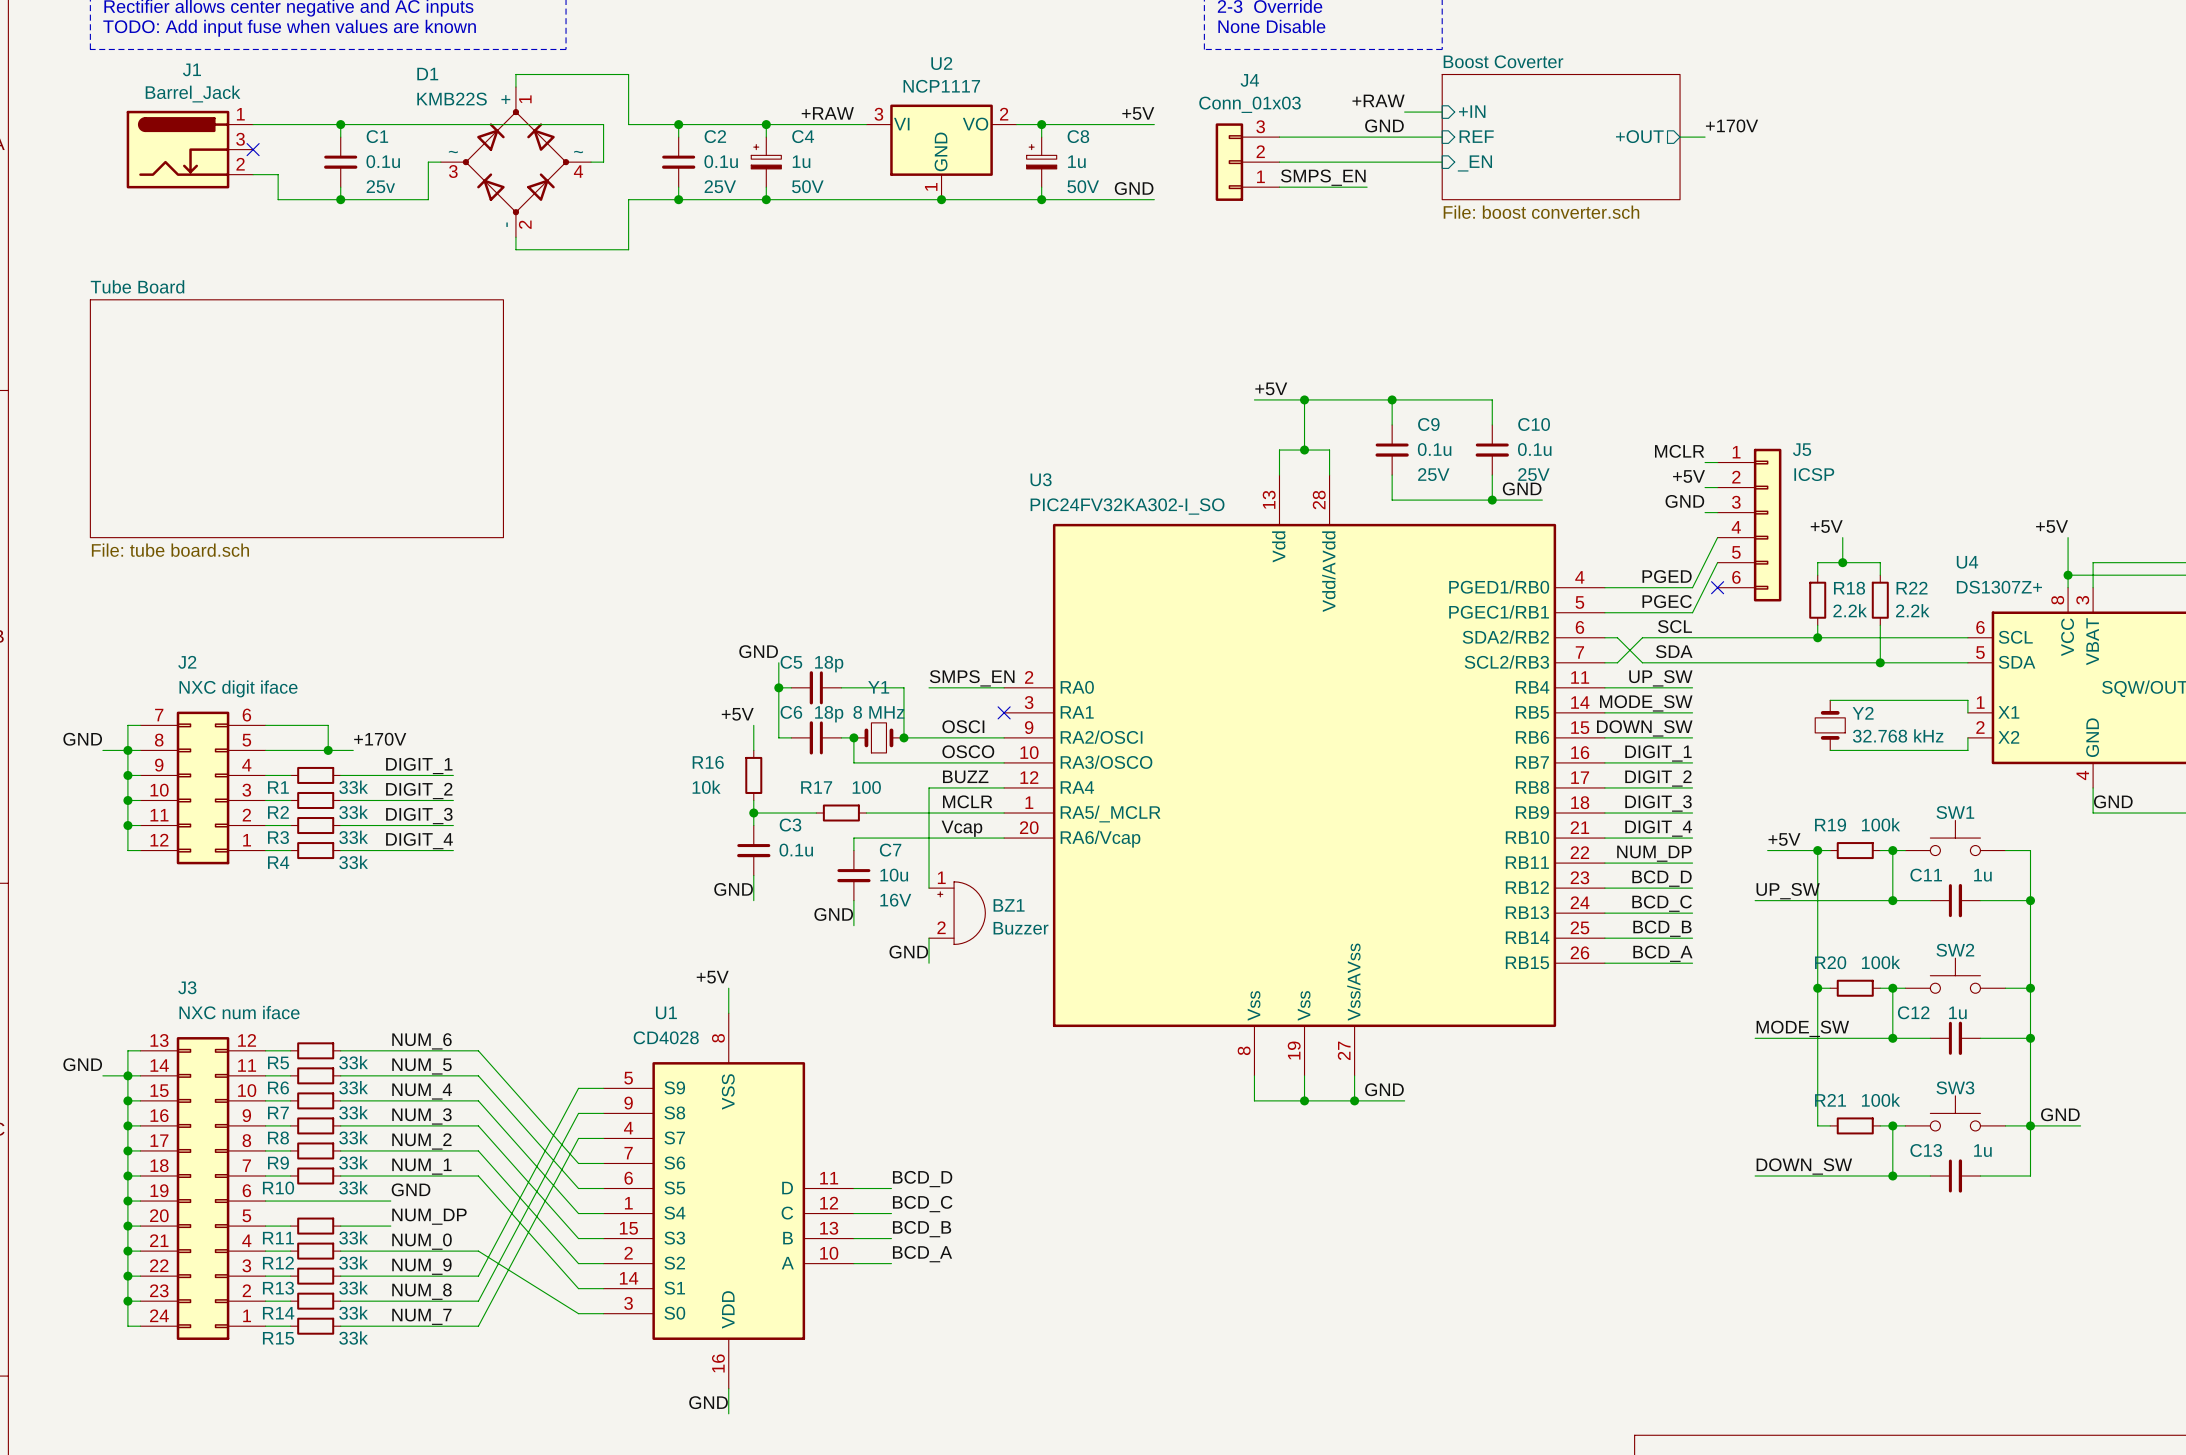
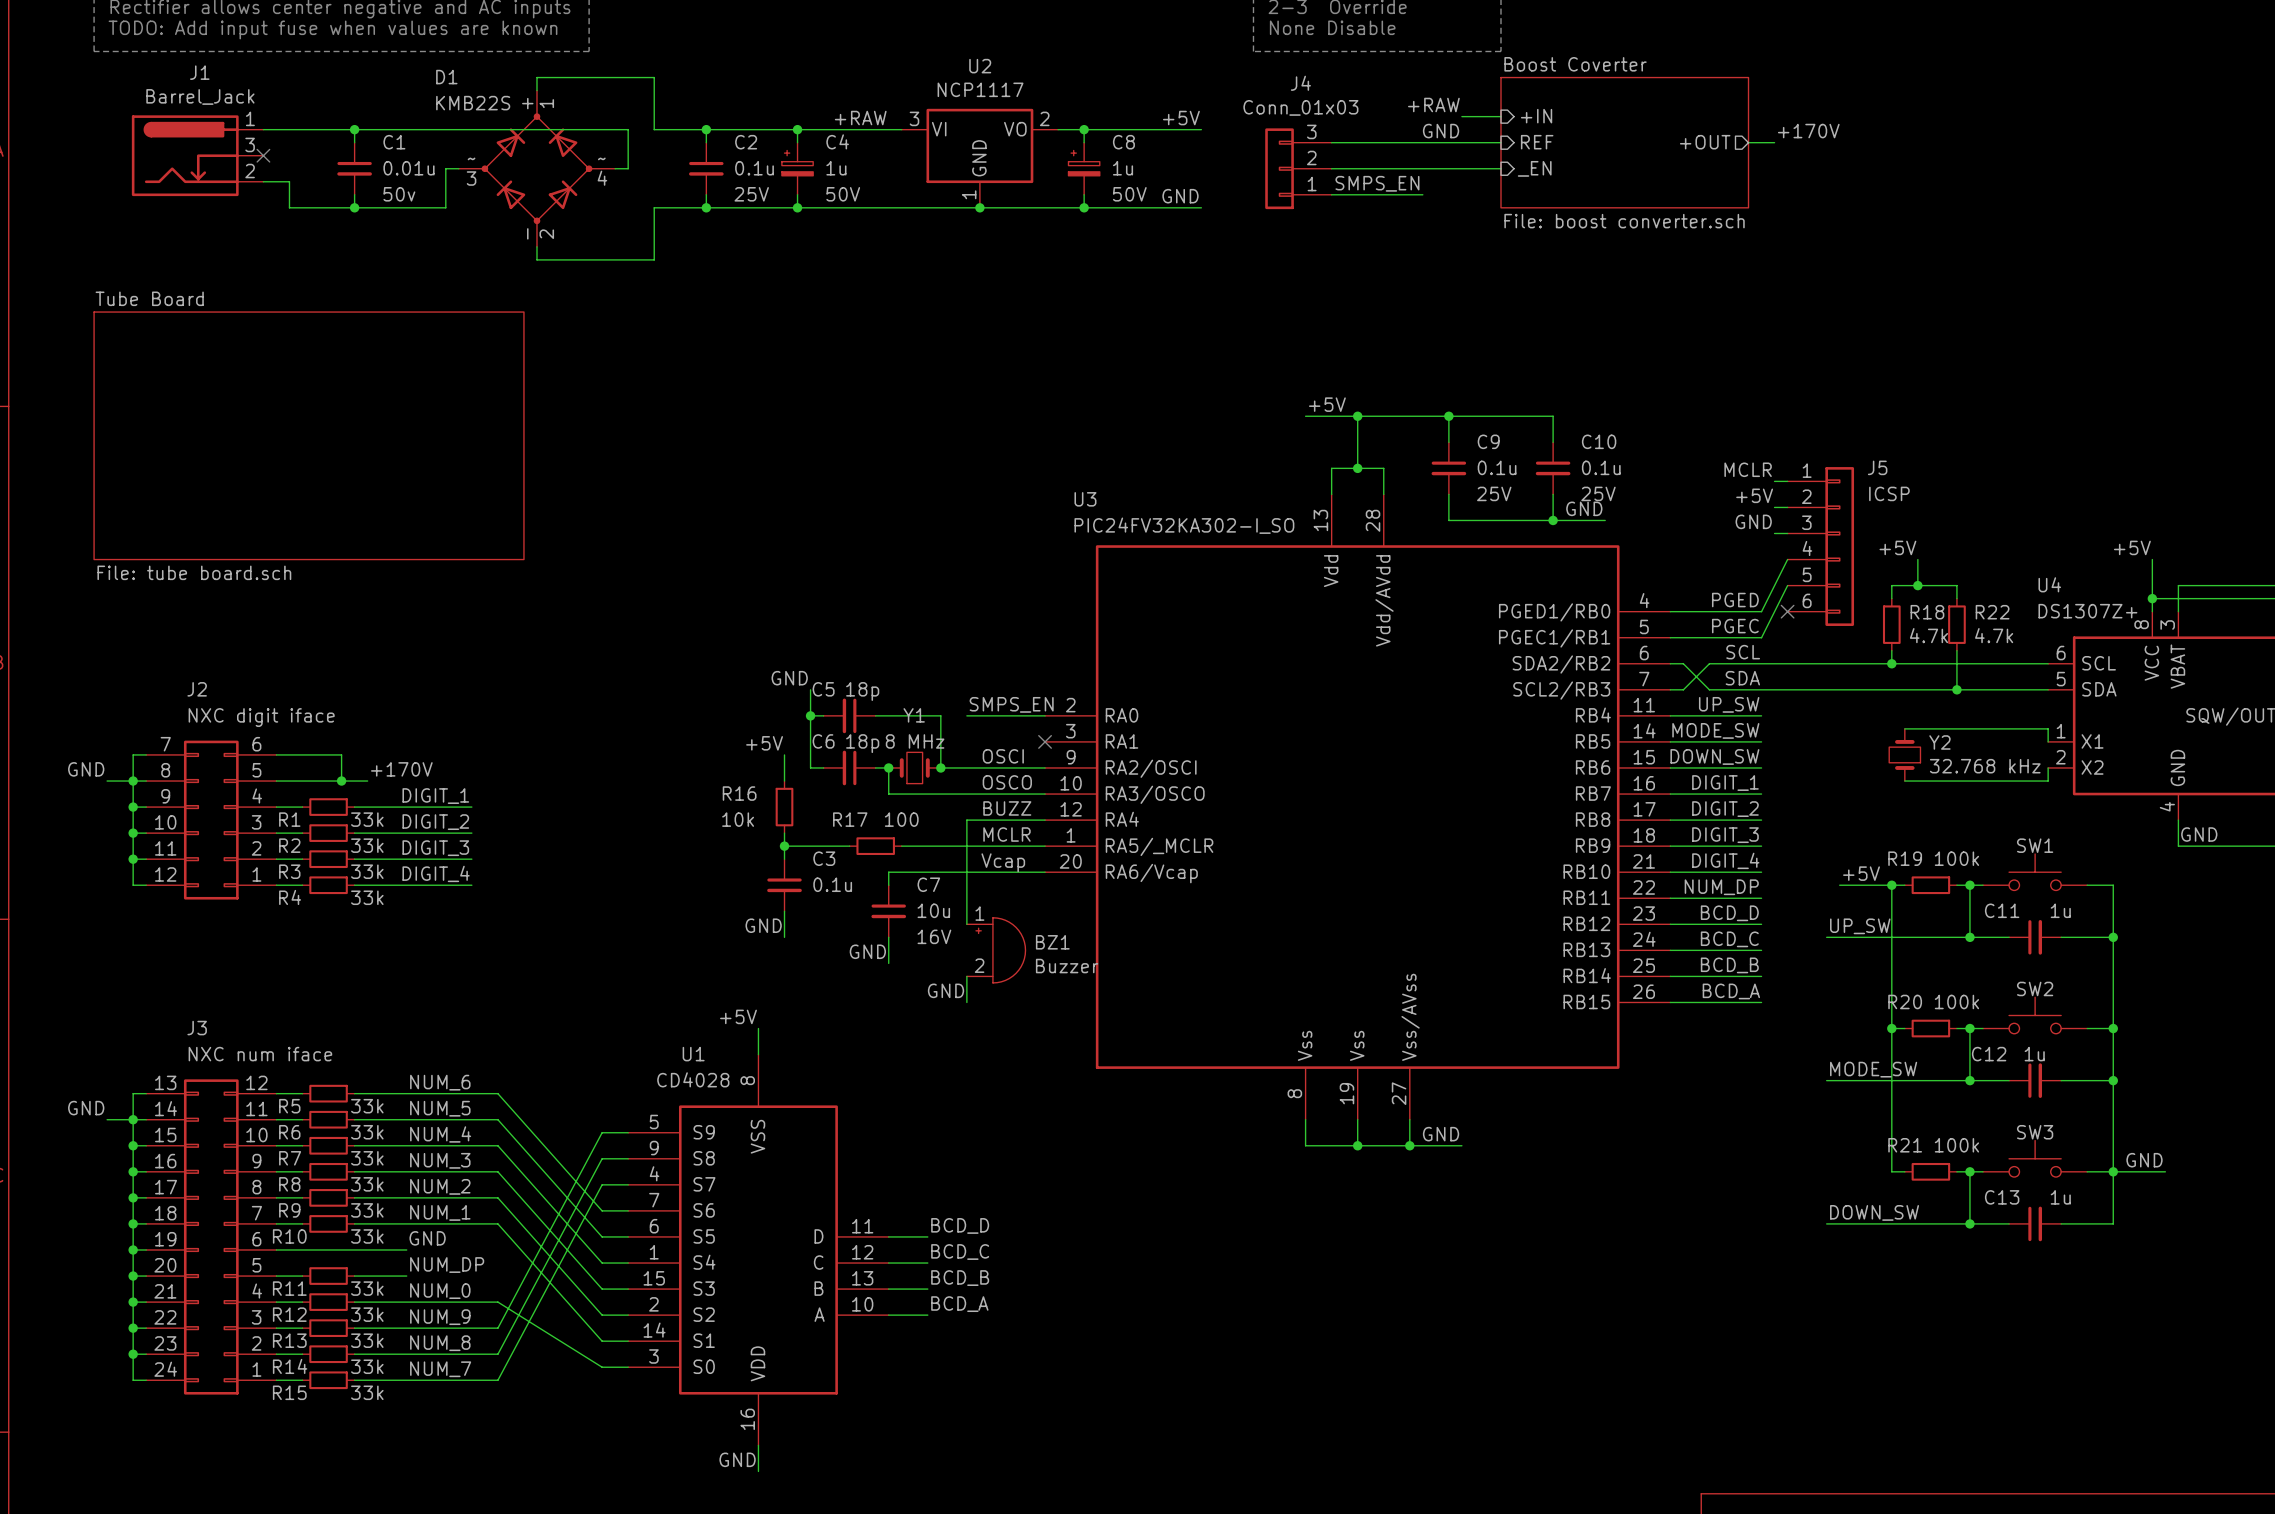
C1 value: 0.1u (383, 161) -> 0.01u (408, 168)
C1 text: 25v (380, 186) -> 50v (399, 194)
R18 value: 2.2k (1850, 610) -> 4.7k (1928, 635)
R22 value: 2.2k (1912, 610) -> 4.7k (1994, 635)

